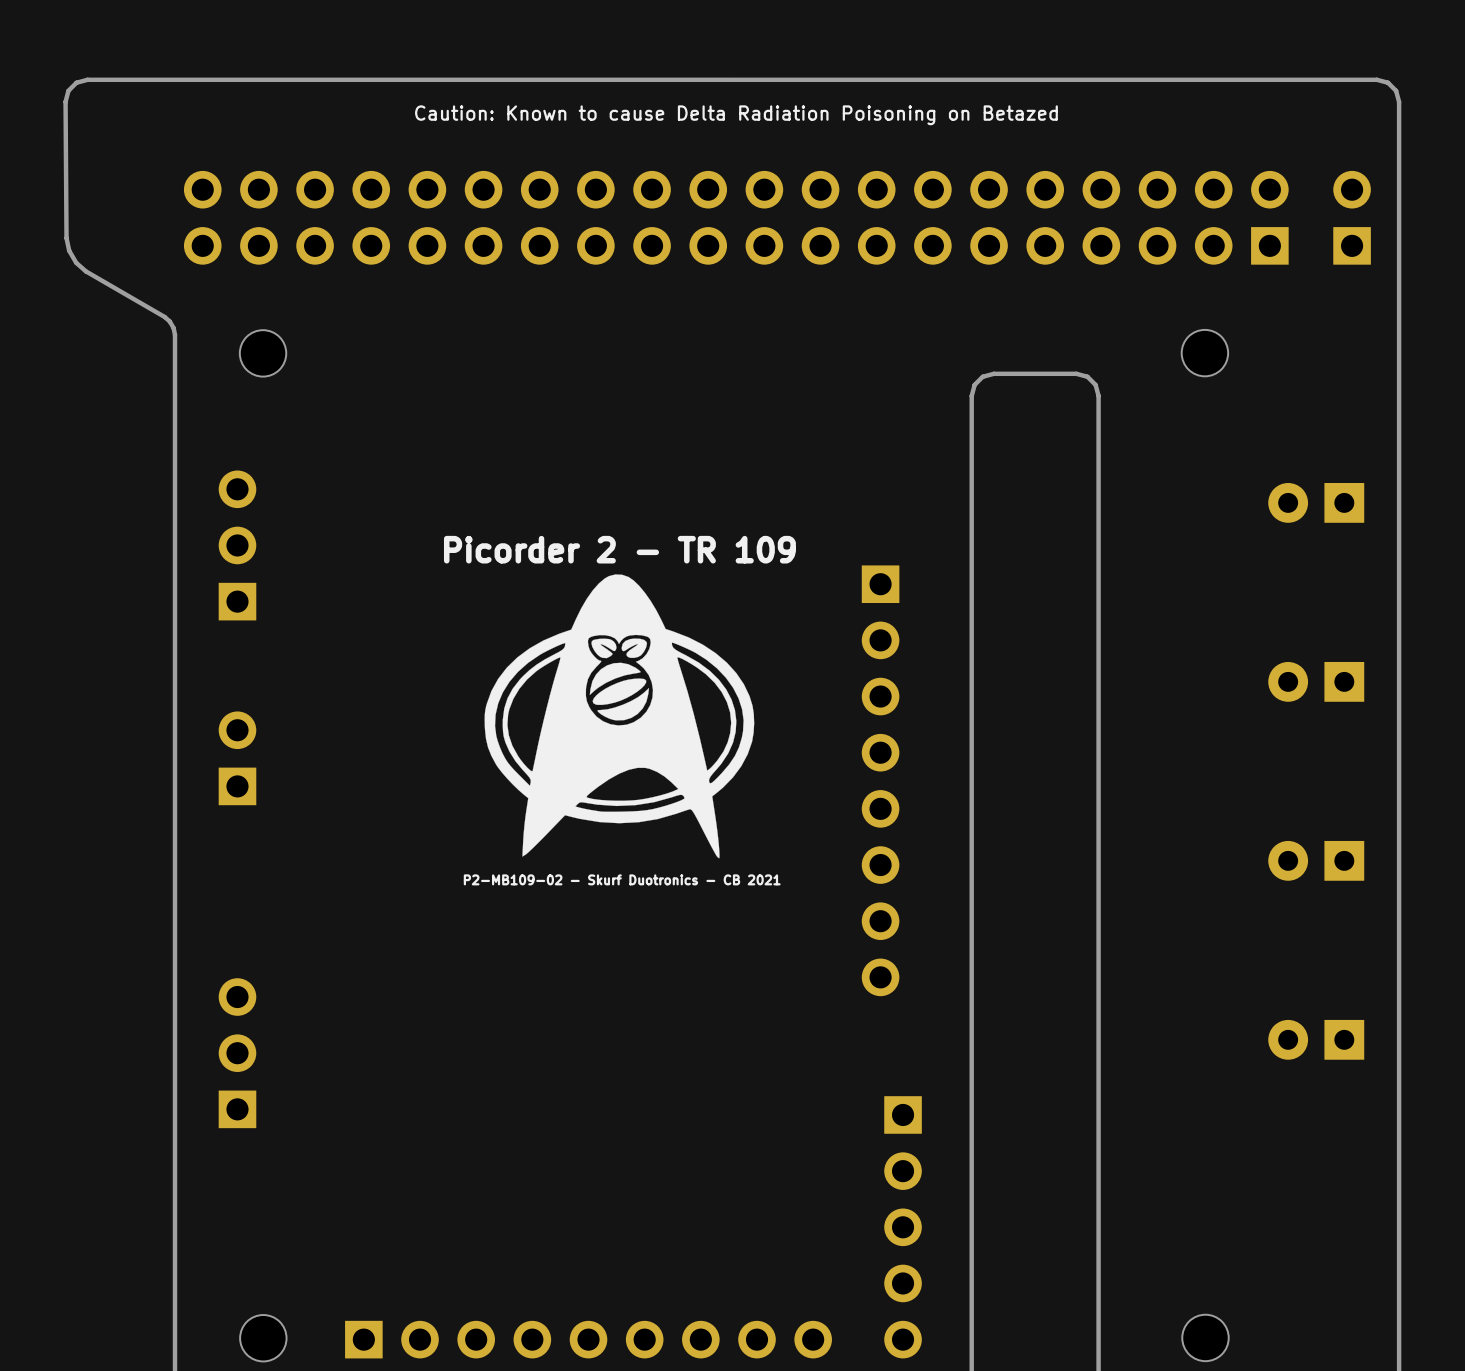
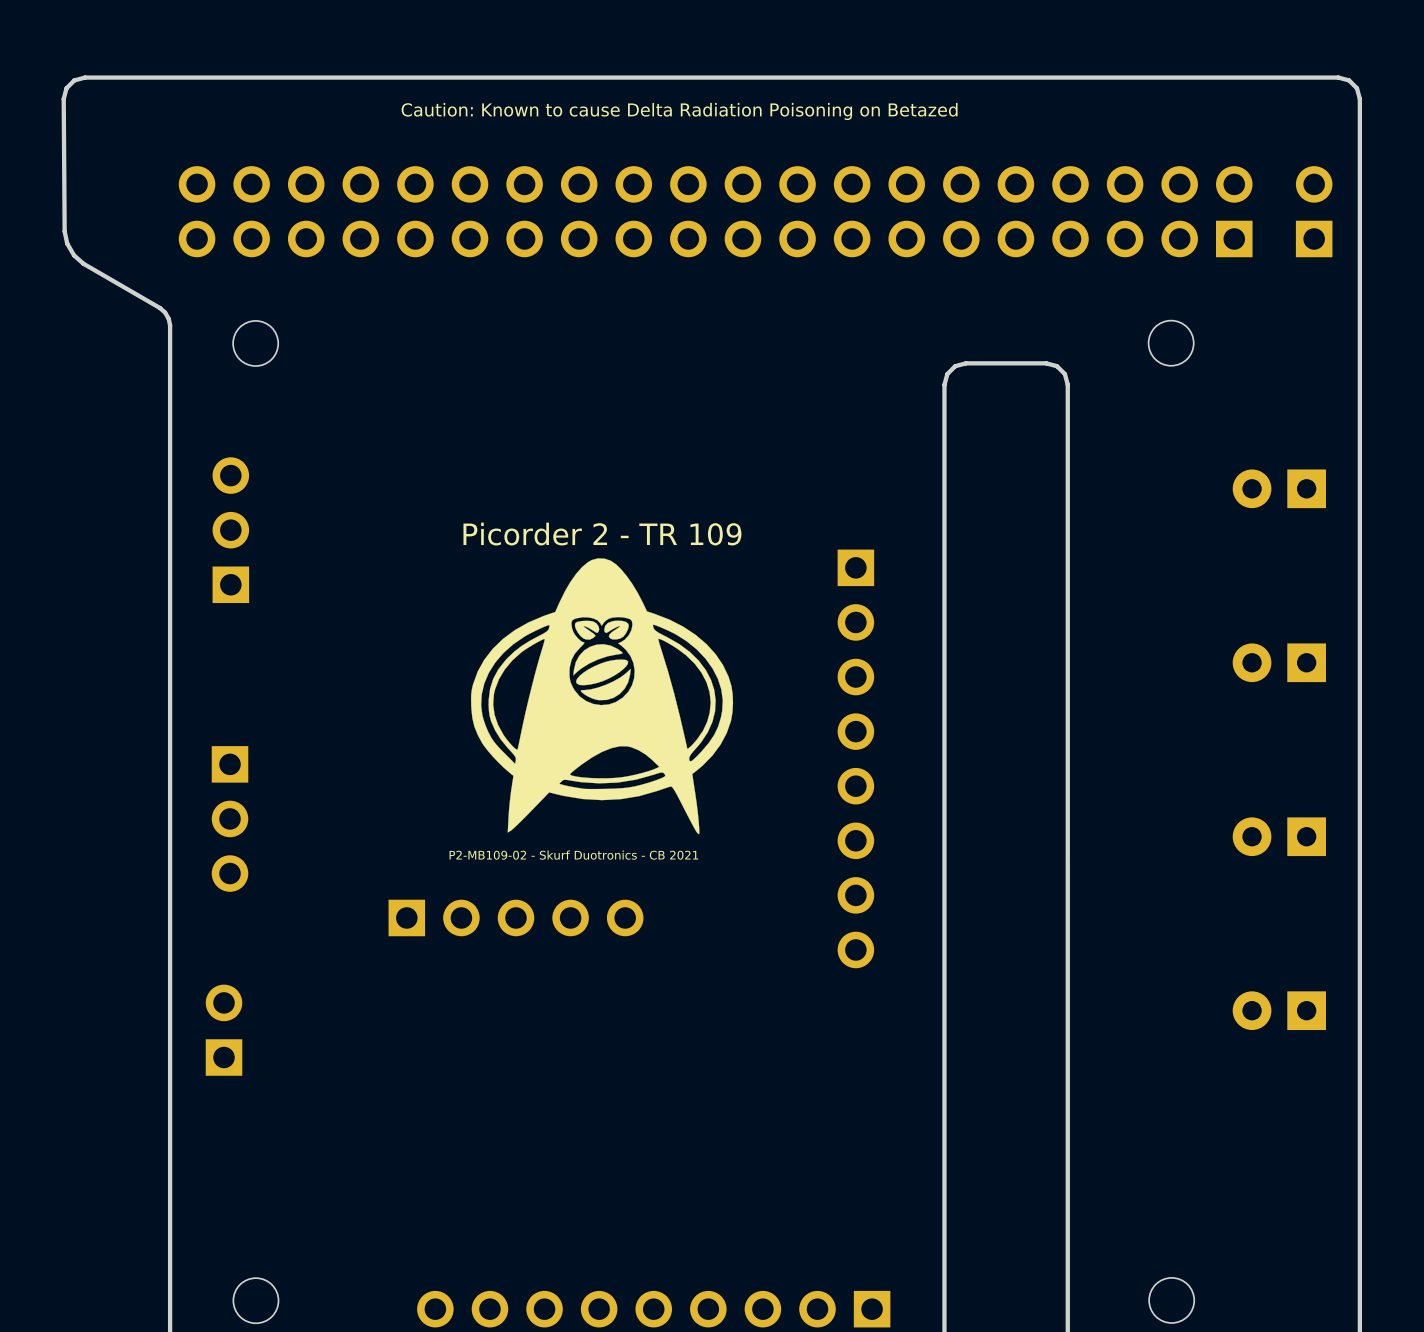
part: (237, 758) -> none
part: none -> (230, 818)
part footprint: [218, 978, 257, 1129] -> [205, 984, 243, 1076]
part rotation: 0° (903, 1227) -> 90° counterclockwise (516, 917)
part position: (903, 1227) -> (516, 917)
part rotation: 0° (588, 1339) -> 180° (653, 1309)

